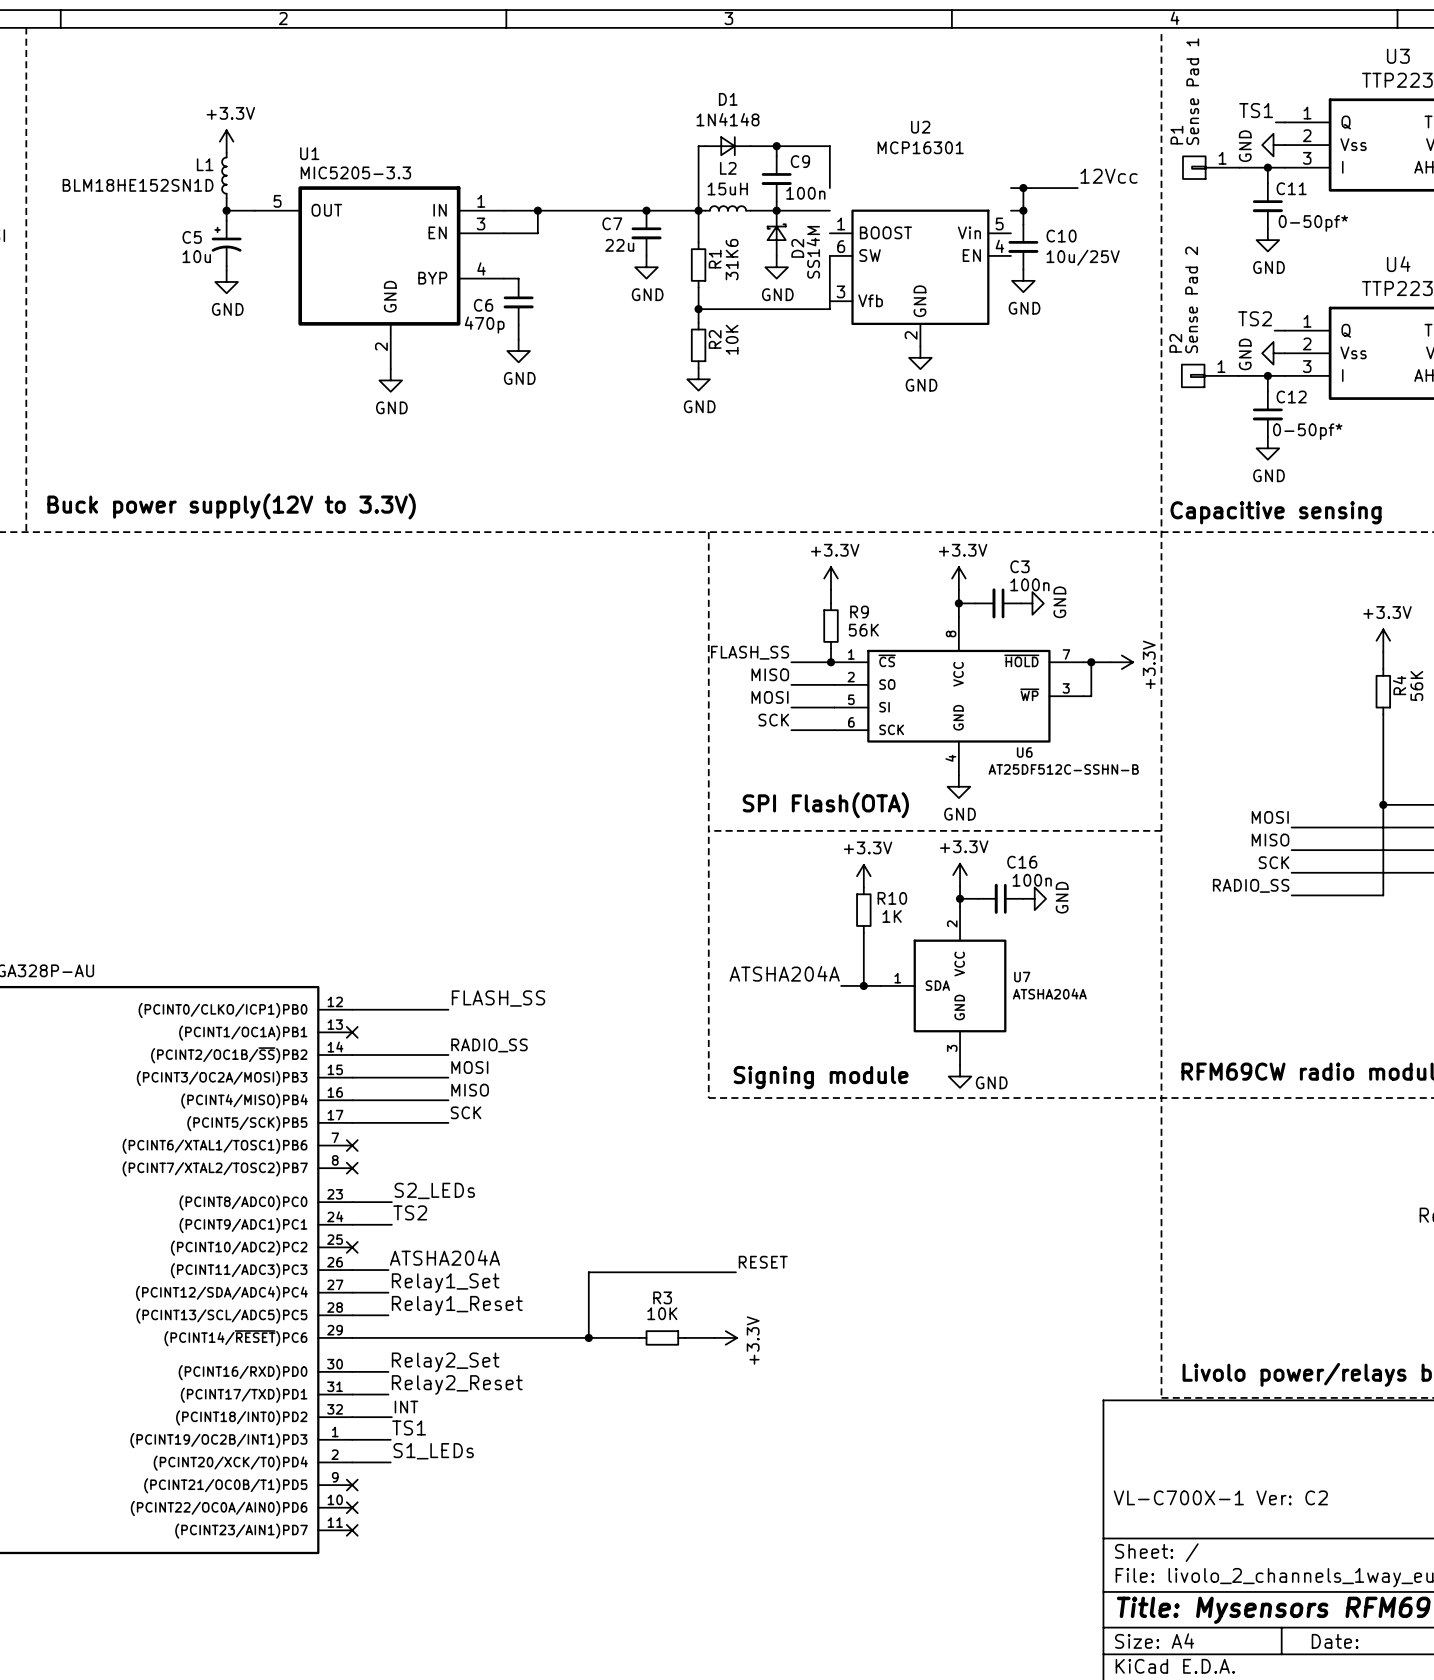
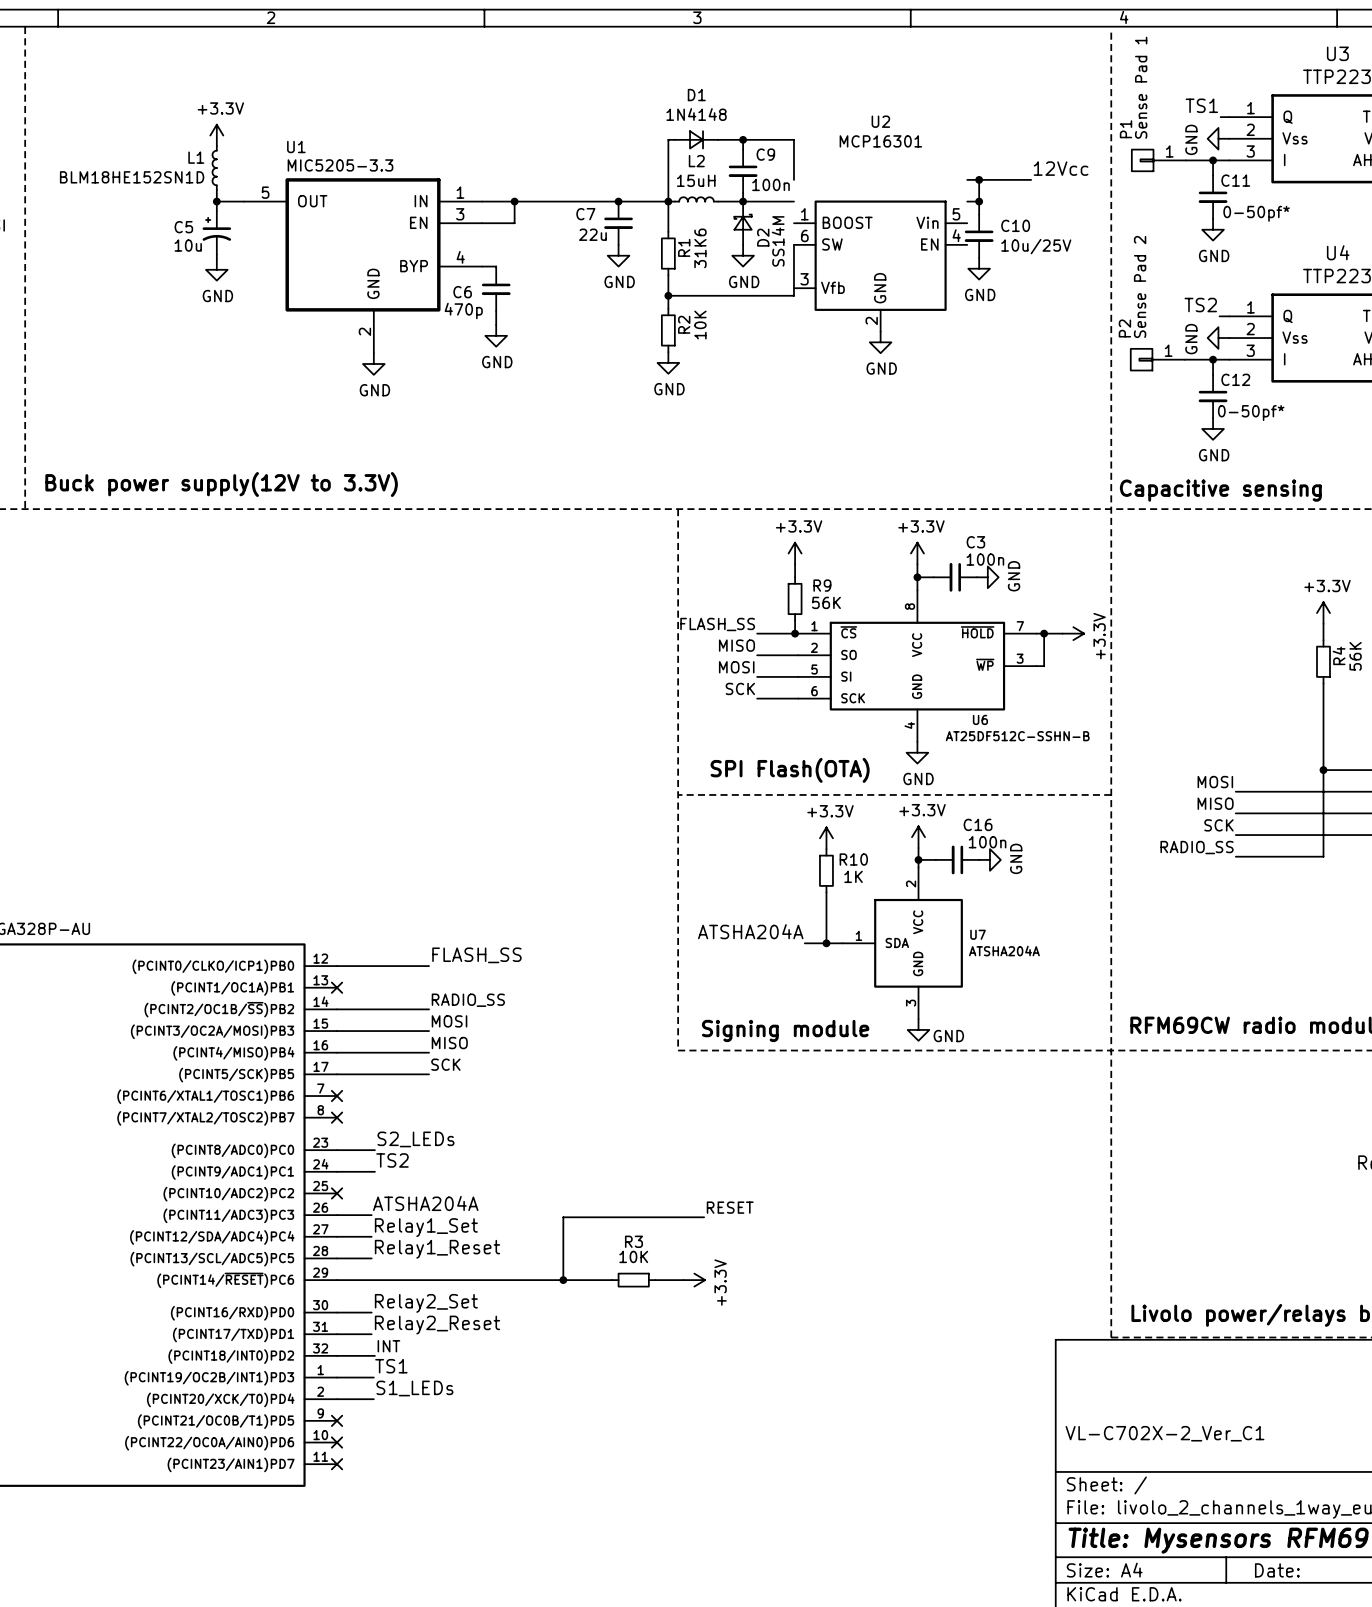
title block: VL-C700X-1 Ver: C2 (1220, 1497) -> VL-C702X-2_Ver_C1 (1164, 1433)

